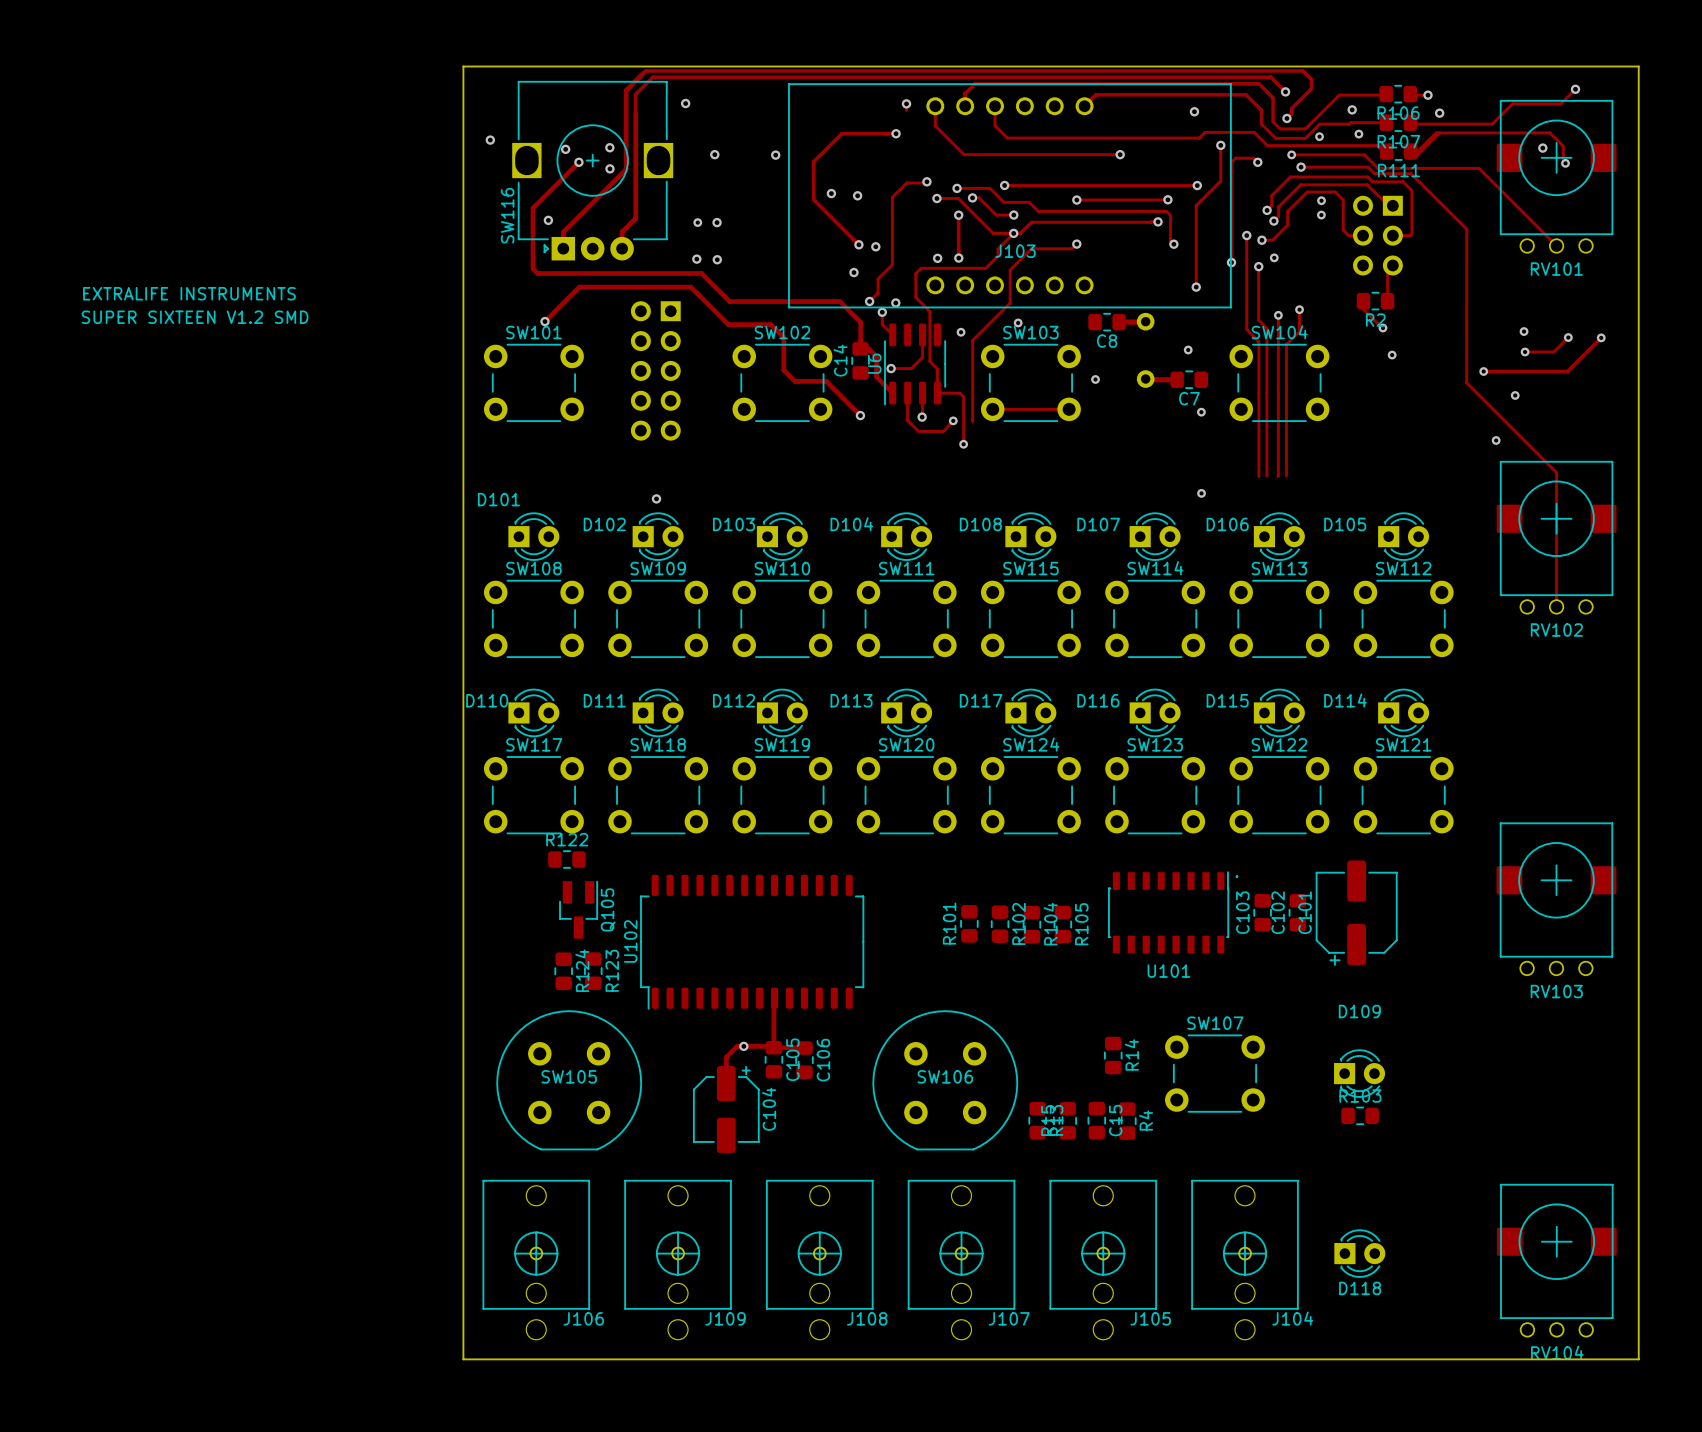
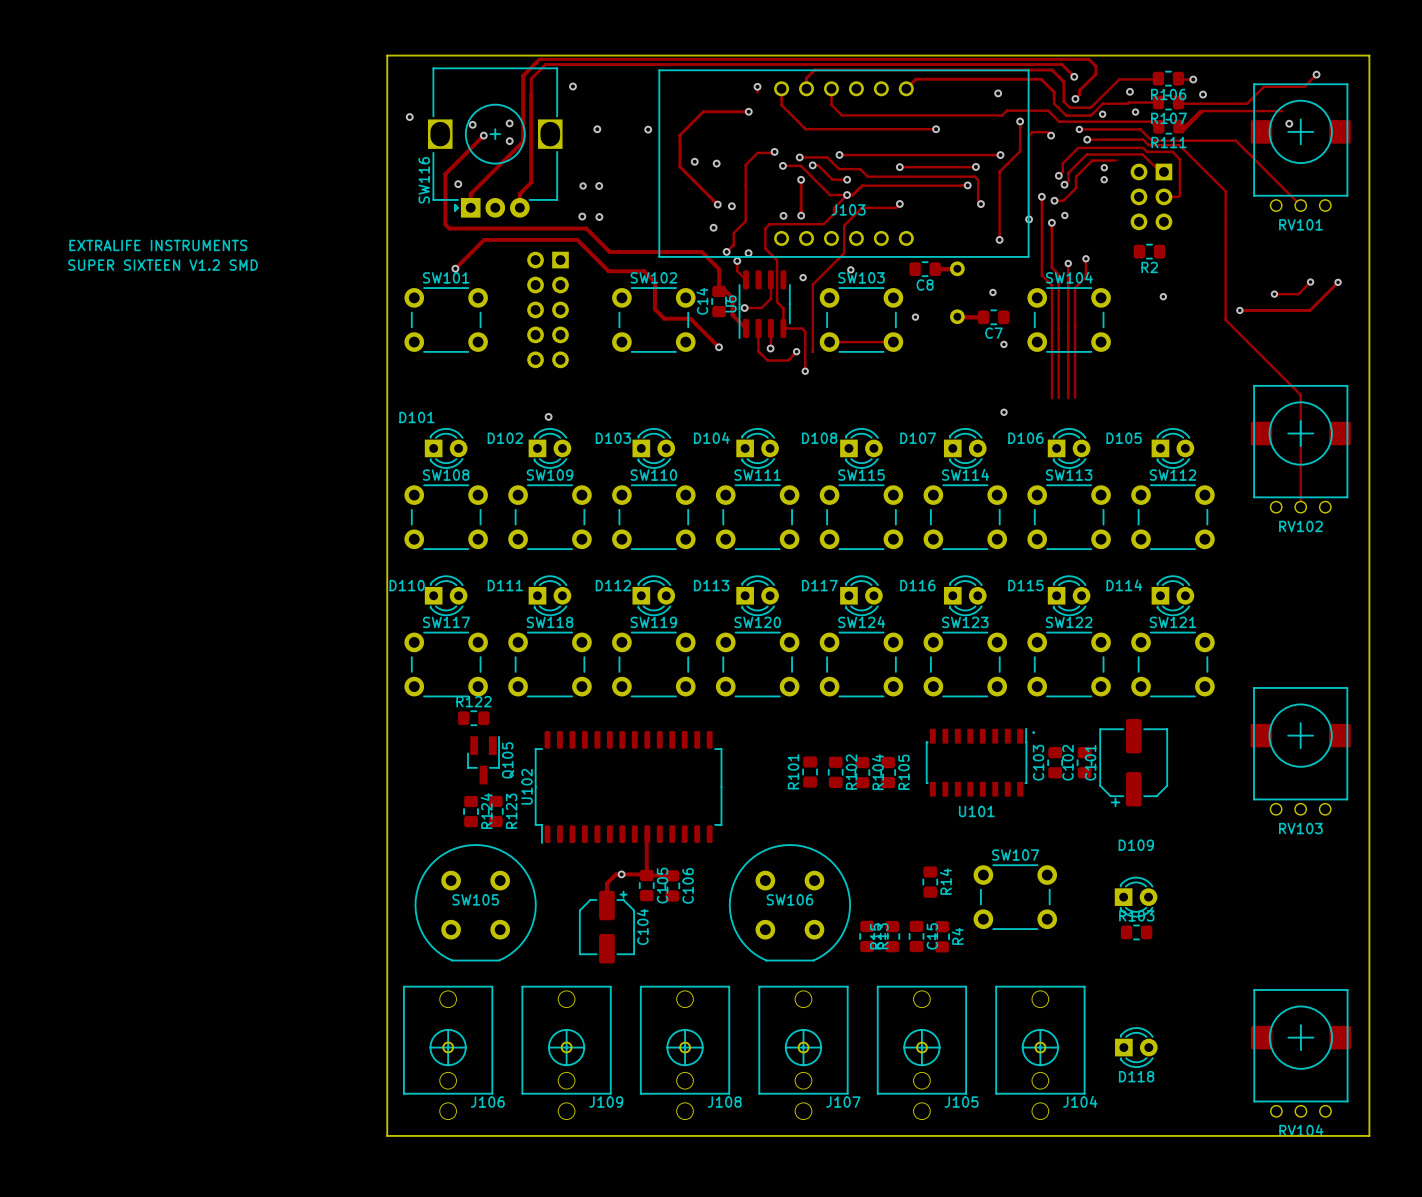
track: (1534, 132) (1550, 132) (1563, 146) (1563, 161) (1565, 163) -> none
via: (1565, 163) -> none
track: (1335, 192) (1343, 200) (1343, 230) (1348, 235) (1363, 235) -> none
track: (1392, 265) (1387, 270) (1387, 301) -> none
track: (1363, 301) (1363, 309) (1382, 328) -> none
via: (1382, 328) -> none
via: (1524, 331) -> none
via: (1515, 395) -> none
via: (1496, 440) -> none

